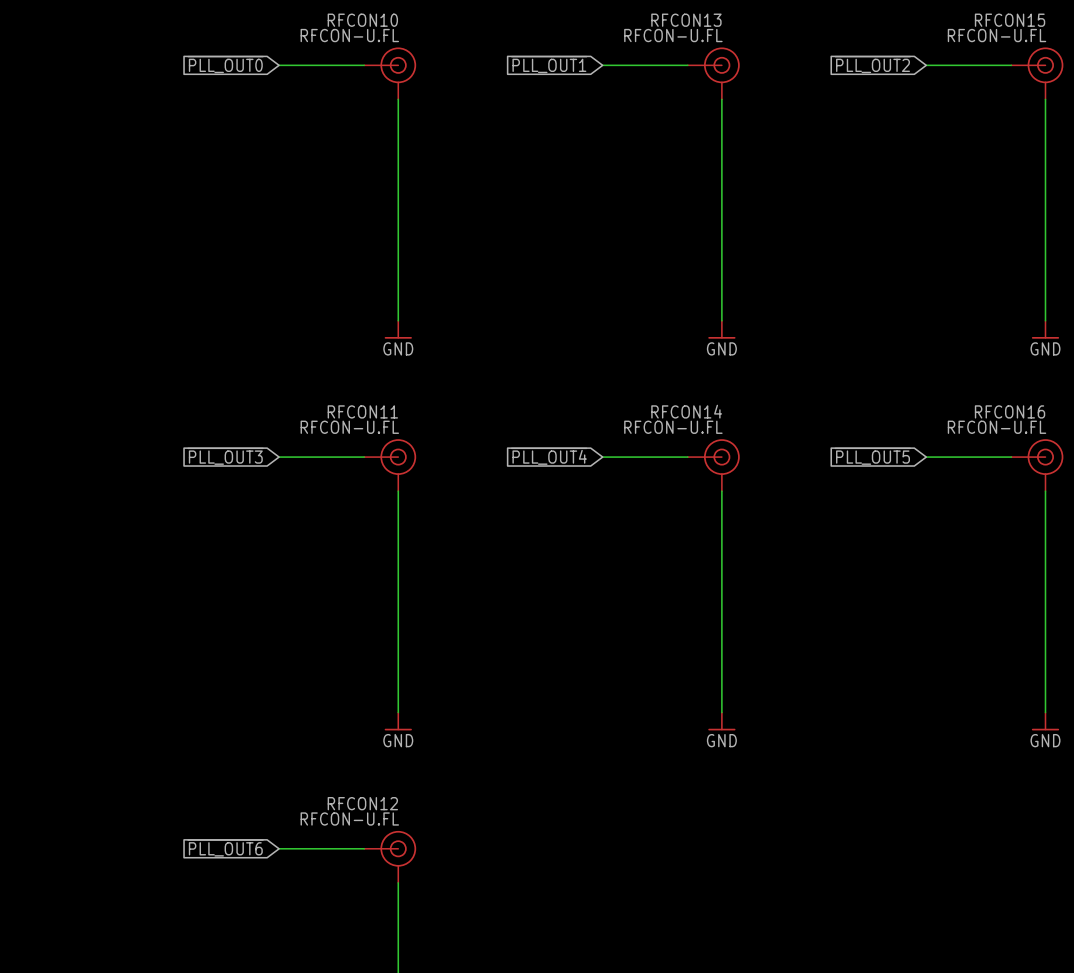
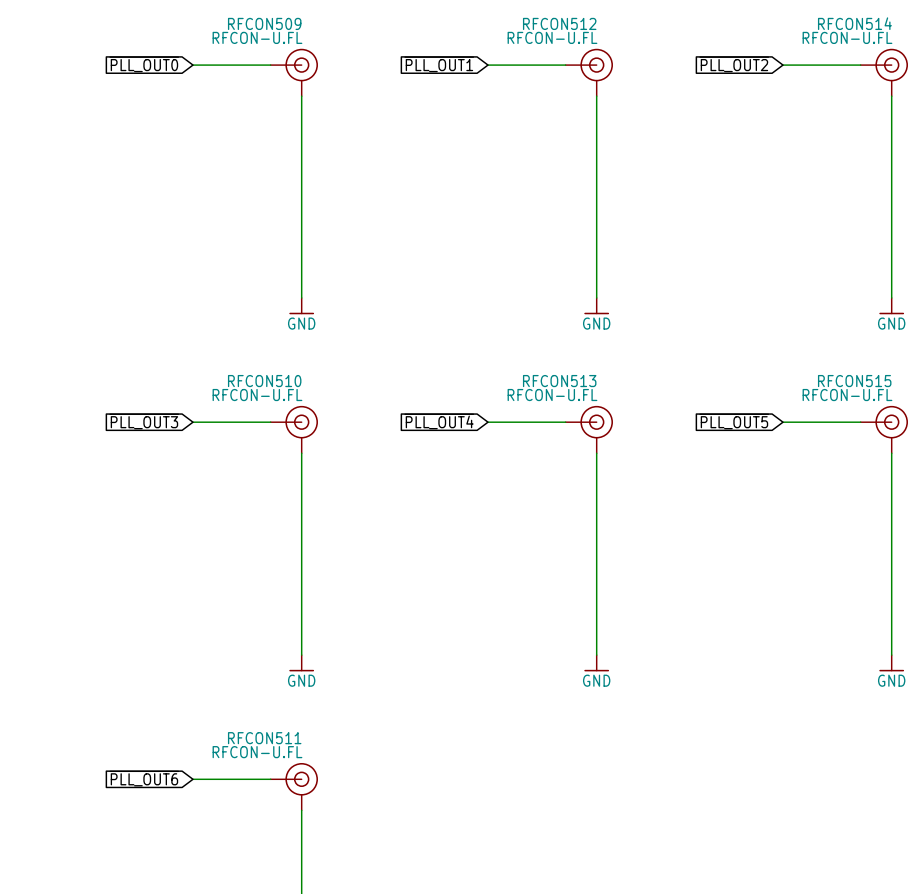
RFCON10 name: RFCON10 (362, 20) -> RFCON509 (264, 23)
RFCON13 name: RFCON13 (686, 20) -> RFCON512 (559, 23)
RFCON15 name: RFCON15 (1010, 20) -> RFCON514 (854, 23)
RFCON11 name: RFCON11 (362, 411) -> RFCON510 (264, 381)
RFCON14 name: RFCON14 (686, 411) -> RFCON513 (559, 381)
RFCON16 name: RFCON16 (1010, 411) -> RFCON515 (854, 381)
RFCON12 name: RFCON12 (362, 803) -> RFCON511 (264, 738)

